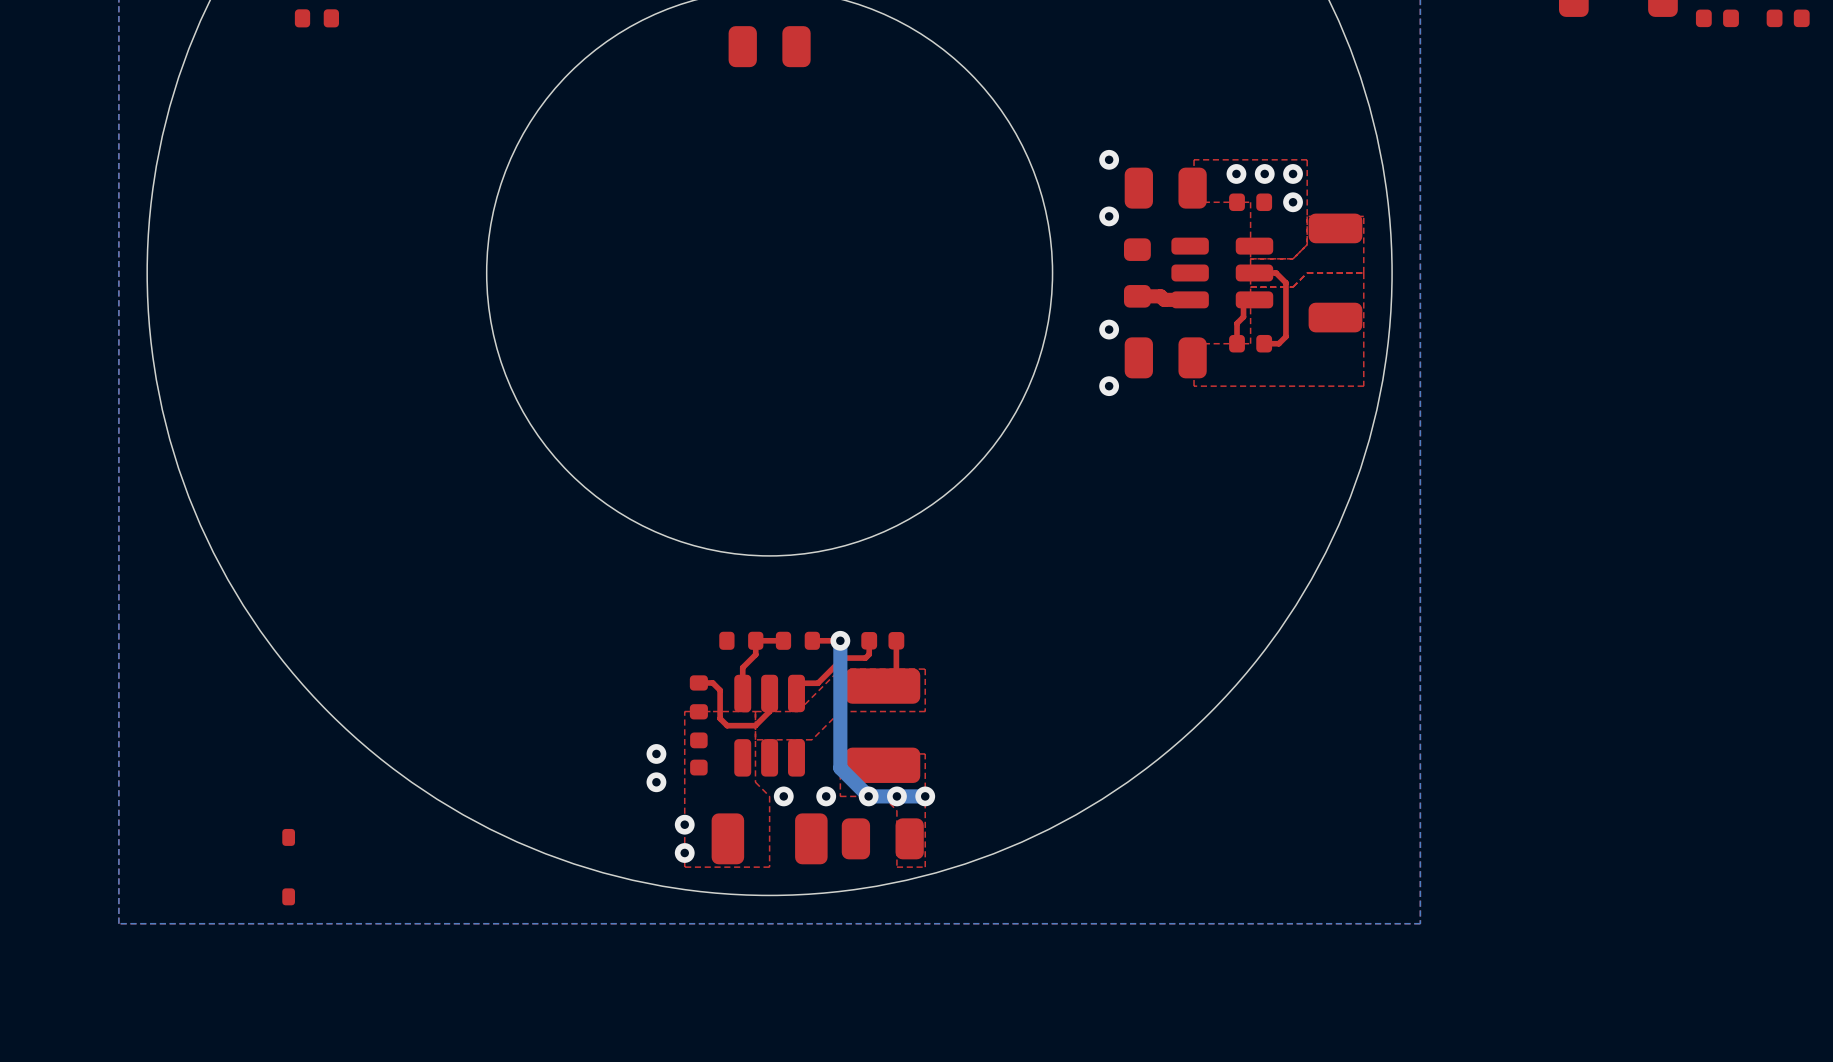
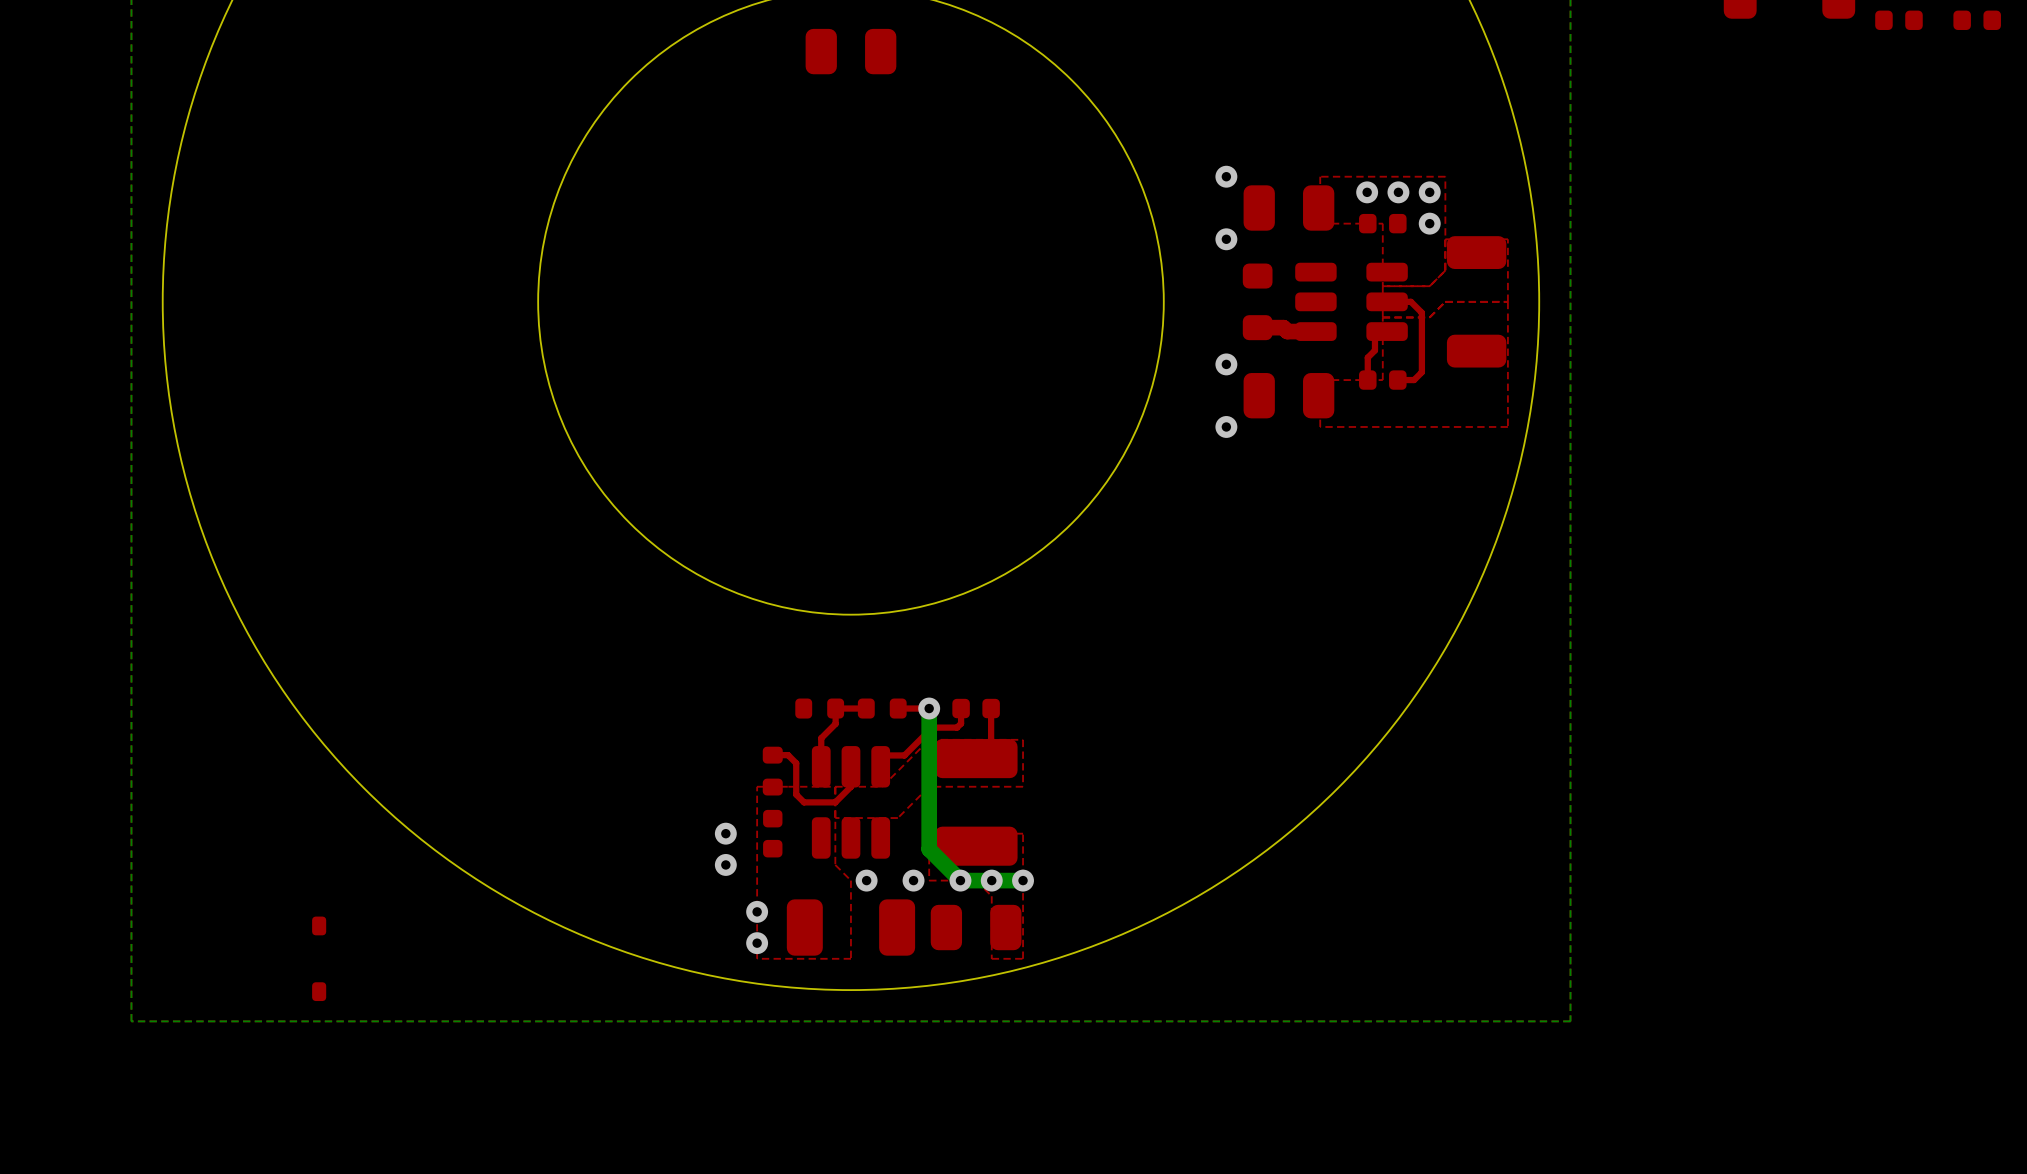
part: (316, 18) -> none

